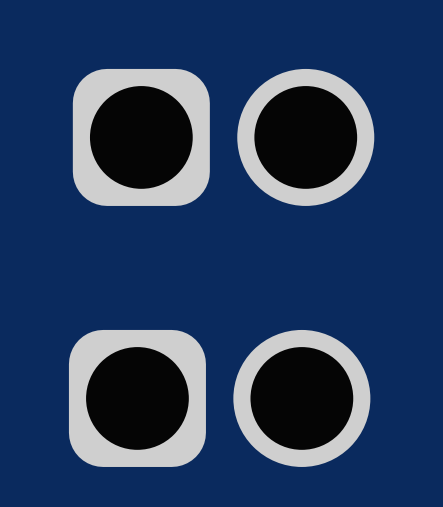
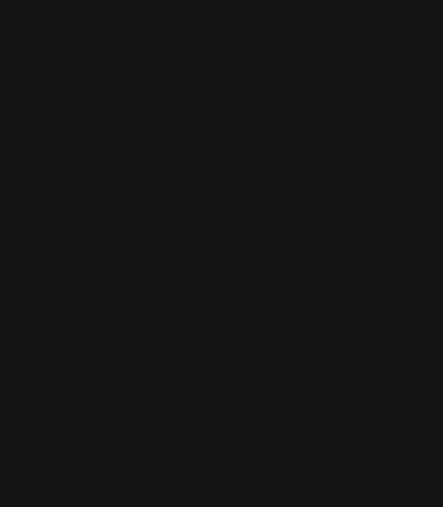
part: (223, 137) -> none
part: (219, 398) -> none

